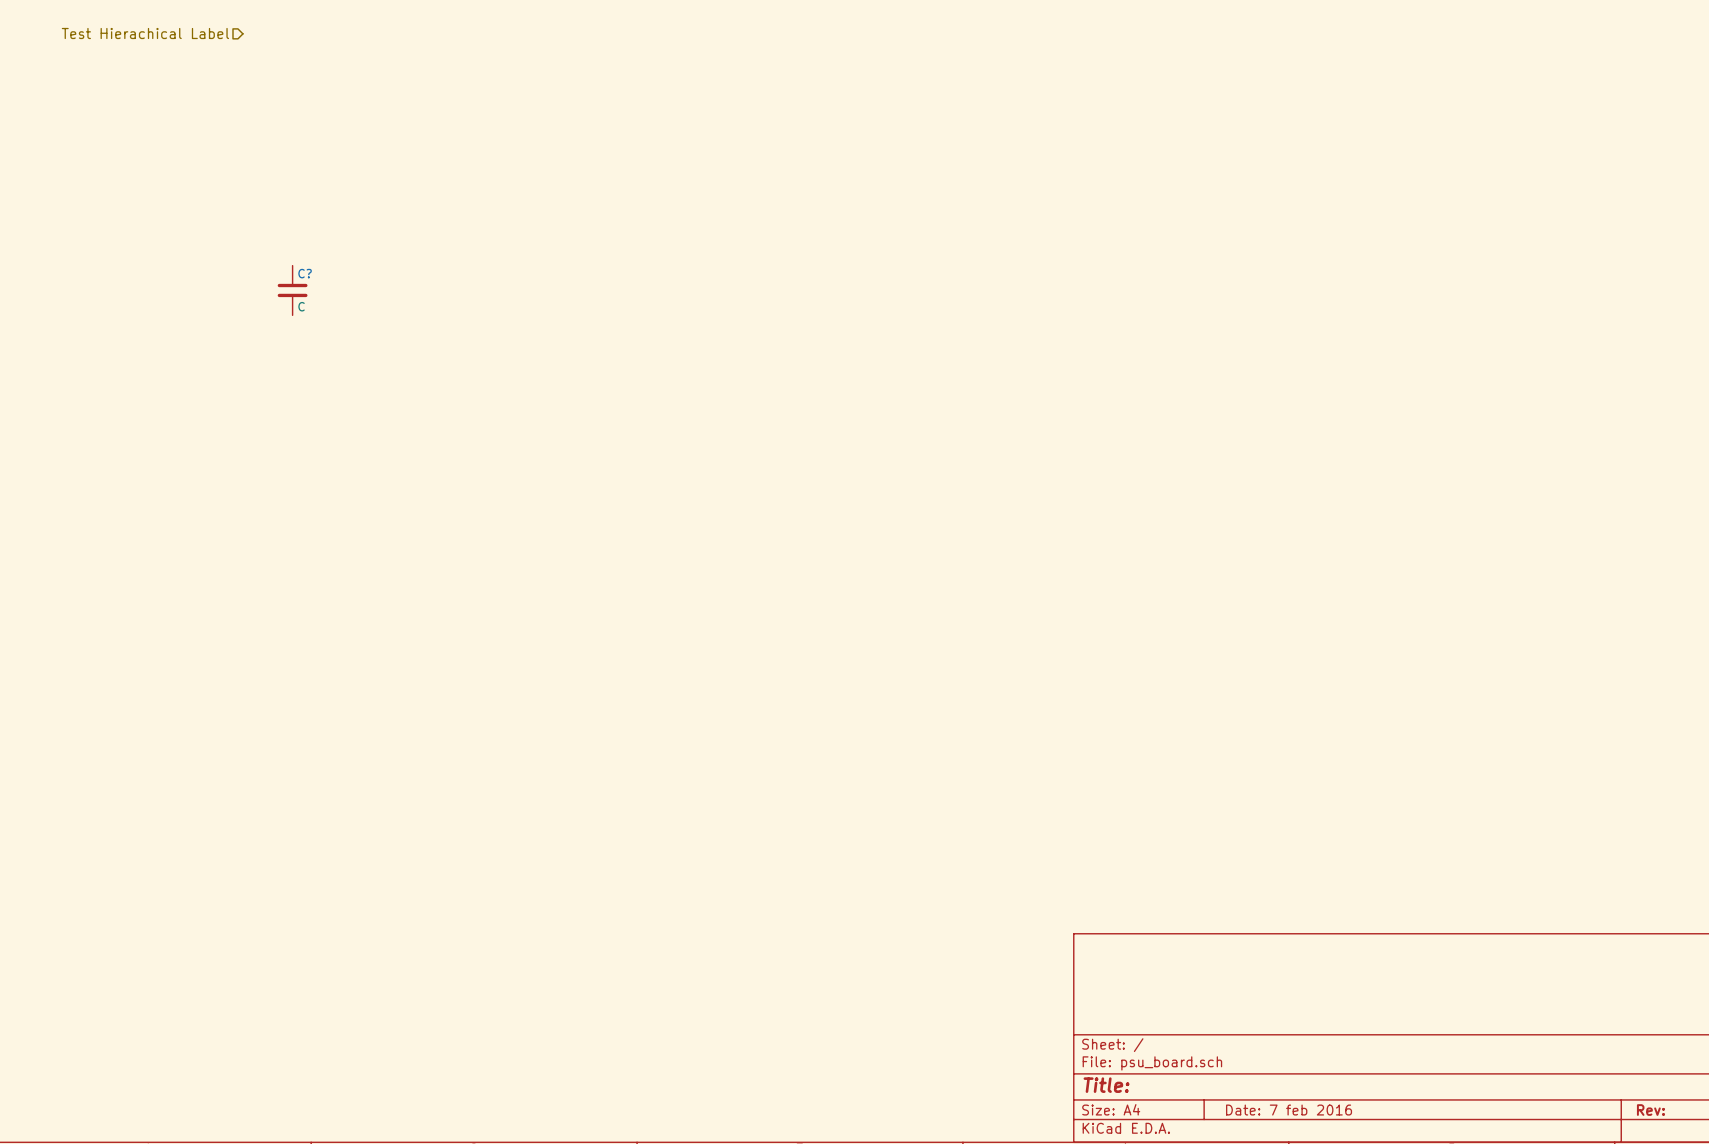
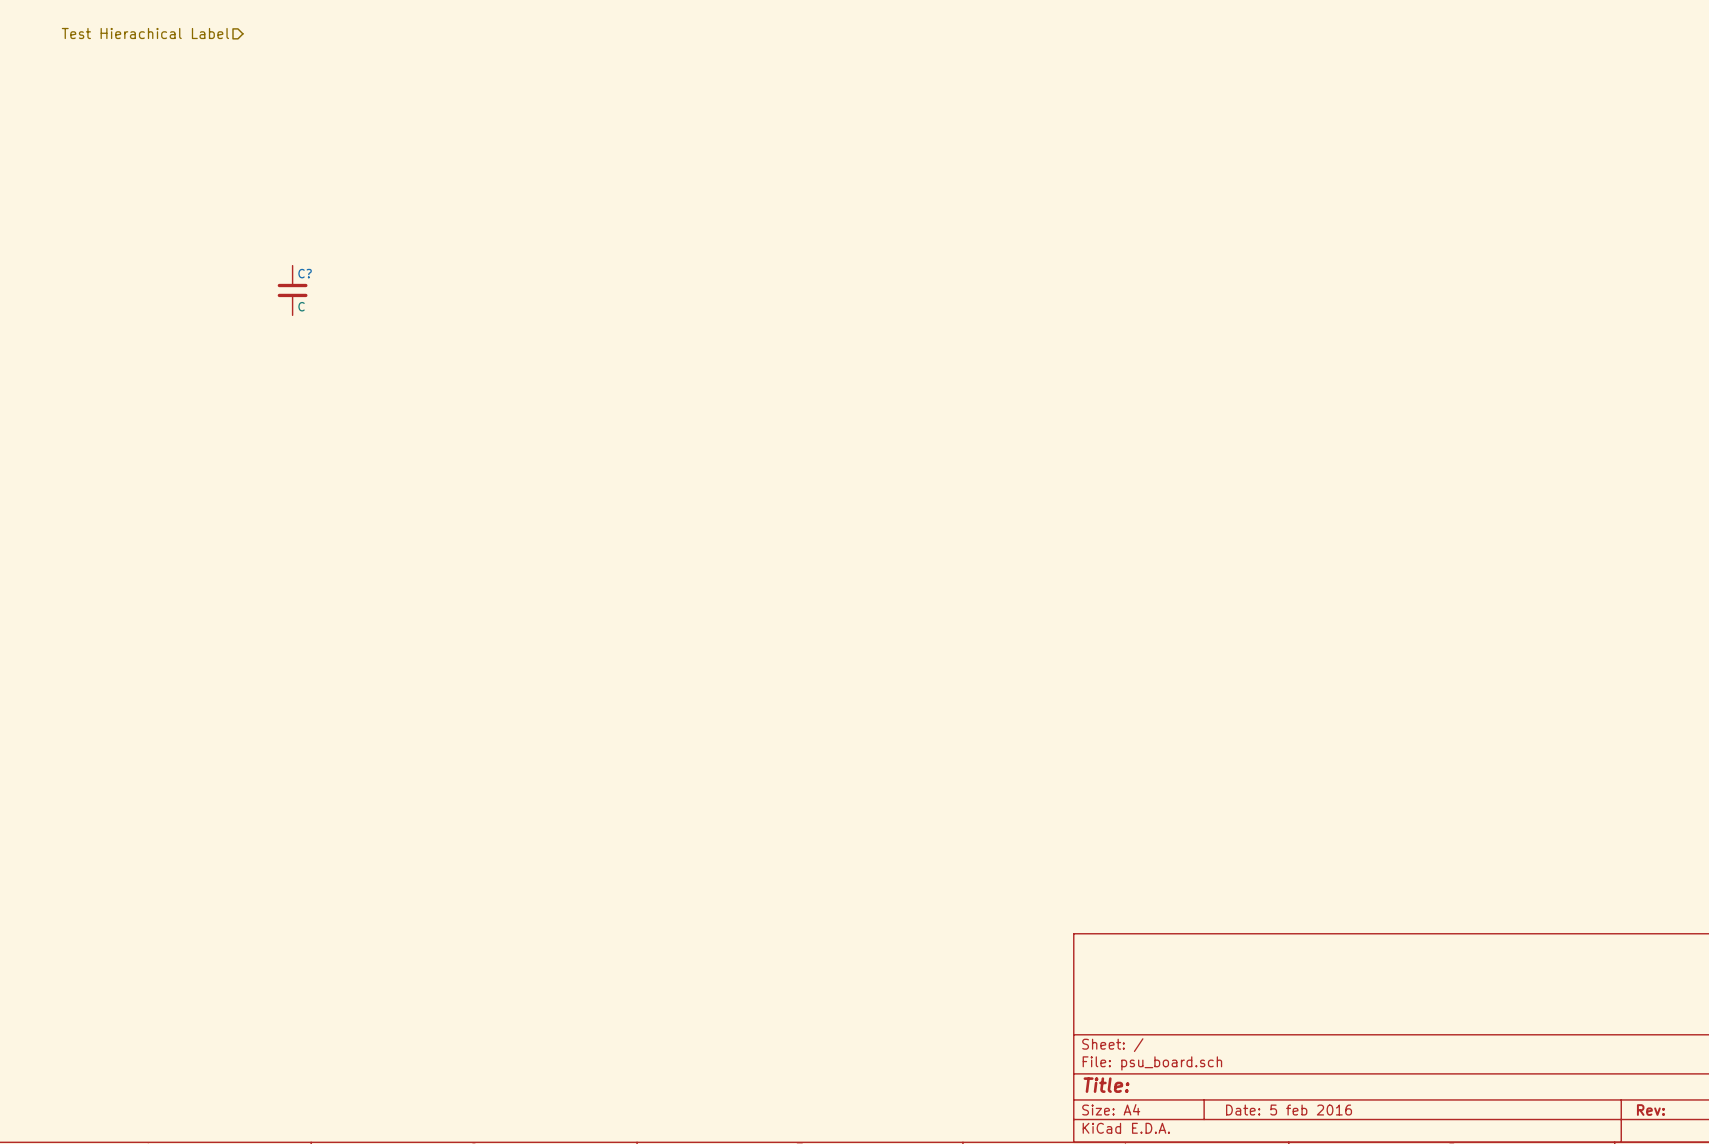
title block: Date: 7 feb 2016 (1289, 1110) -> Date: 5 feb 2016 (1289, 1110)

